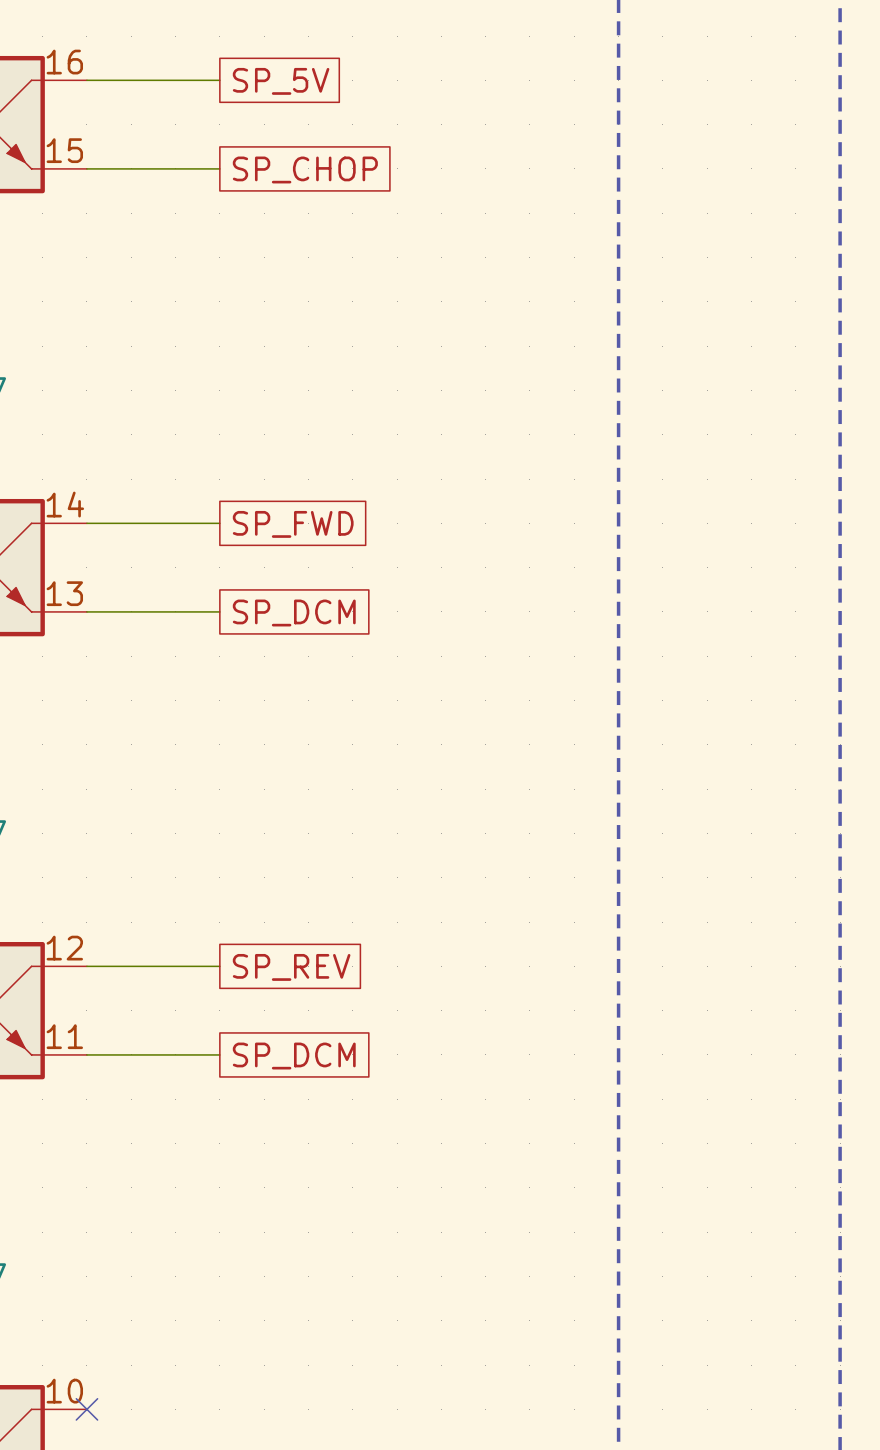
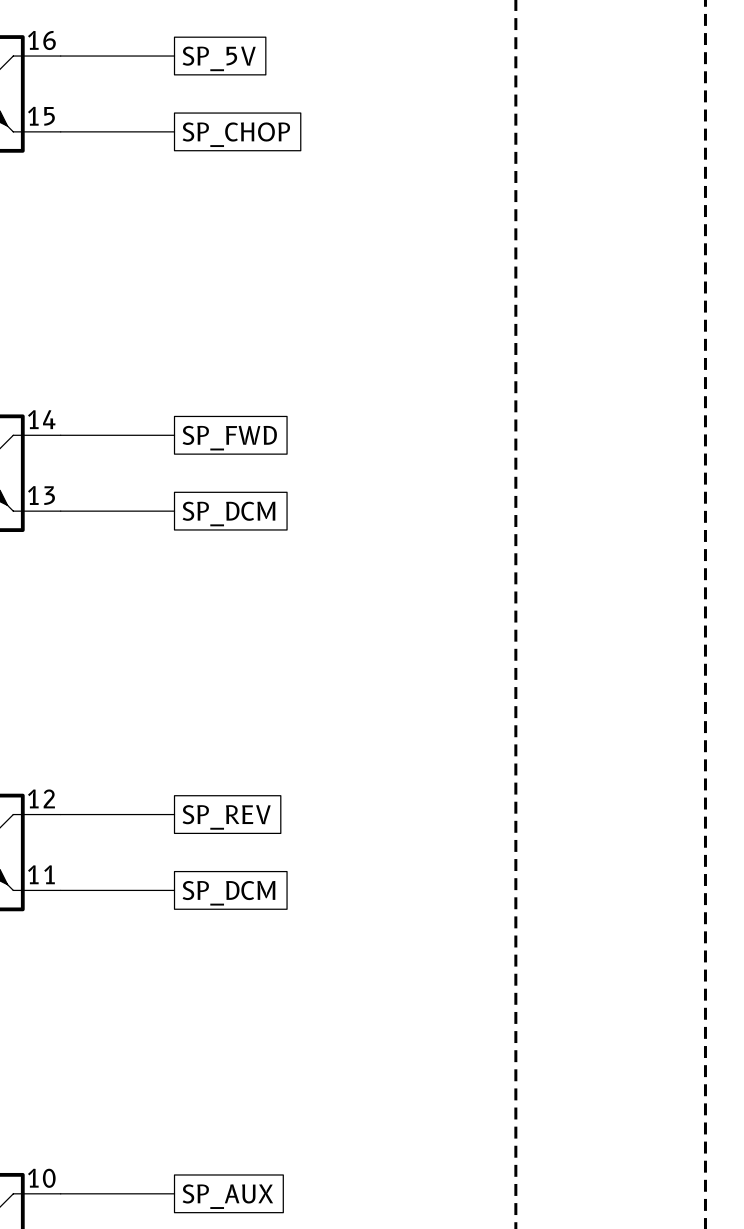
wire: none -> (60, 1193) (174, 1193)
no-connect mark: (86, 1409) -> none
global label: none -> SP_AUX (227, 1196)

